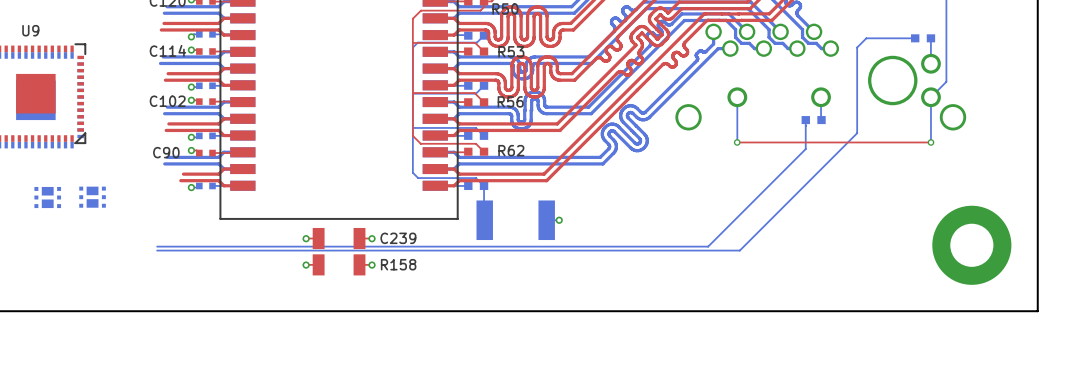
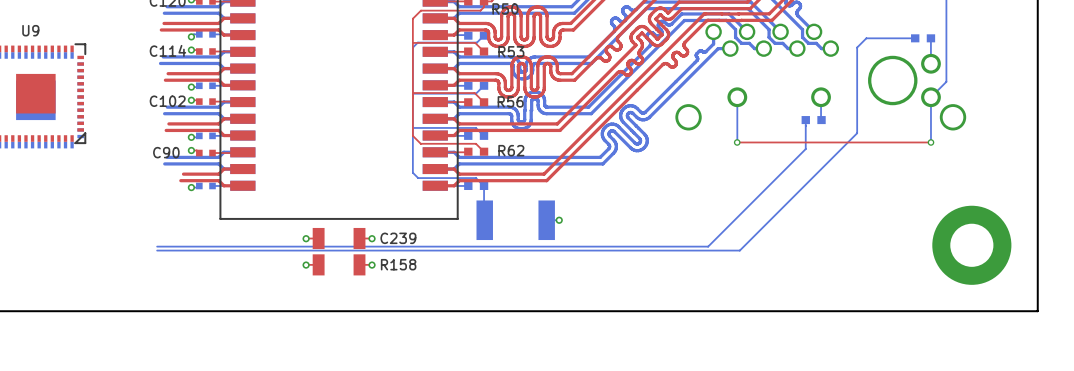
part: (47, 197) -> none
part: (92, 197) -> none

